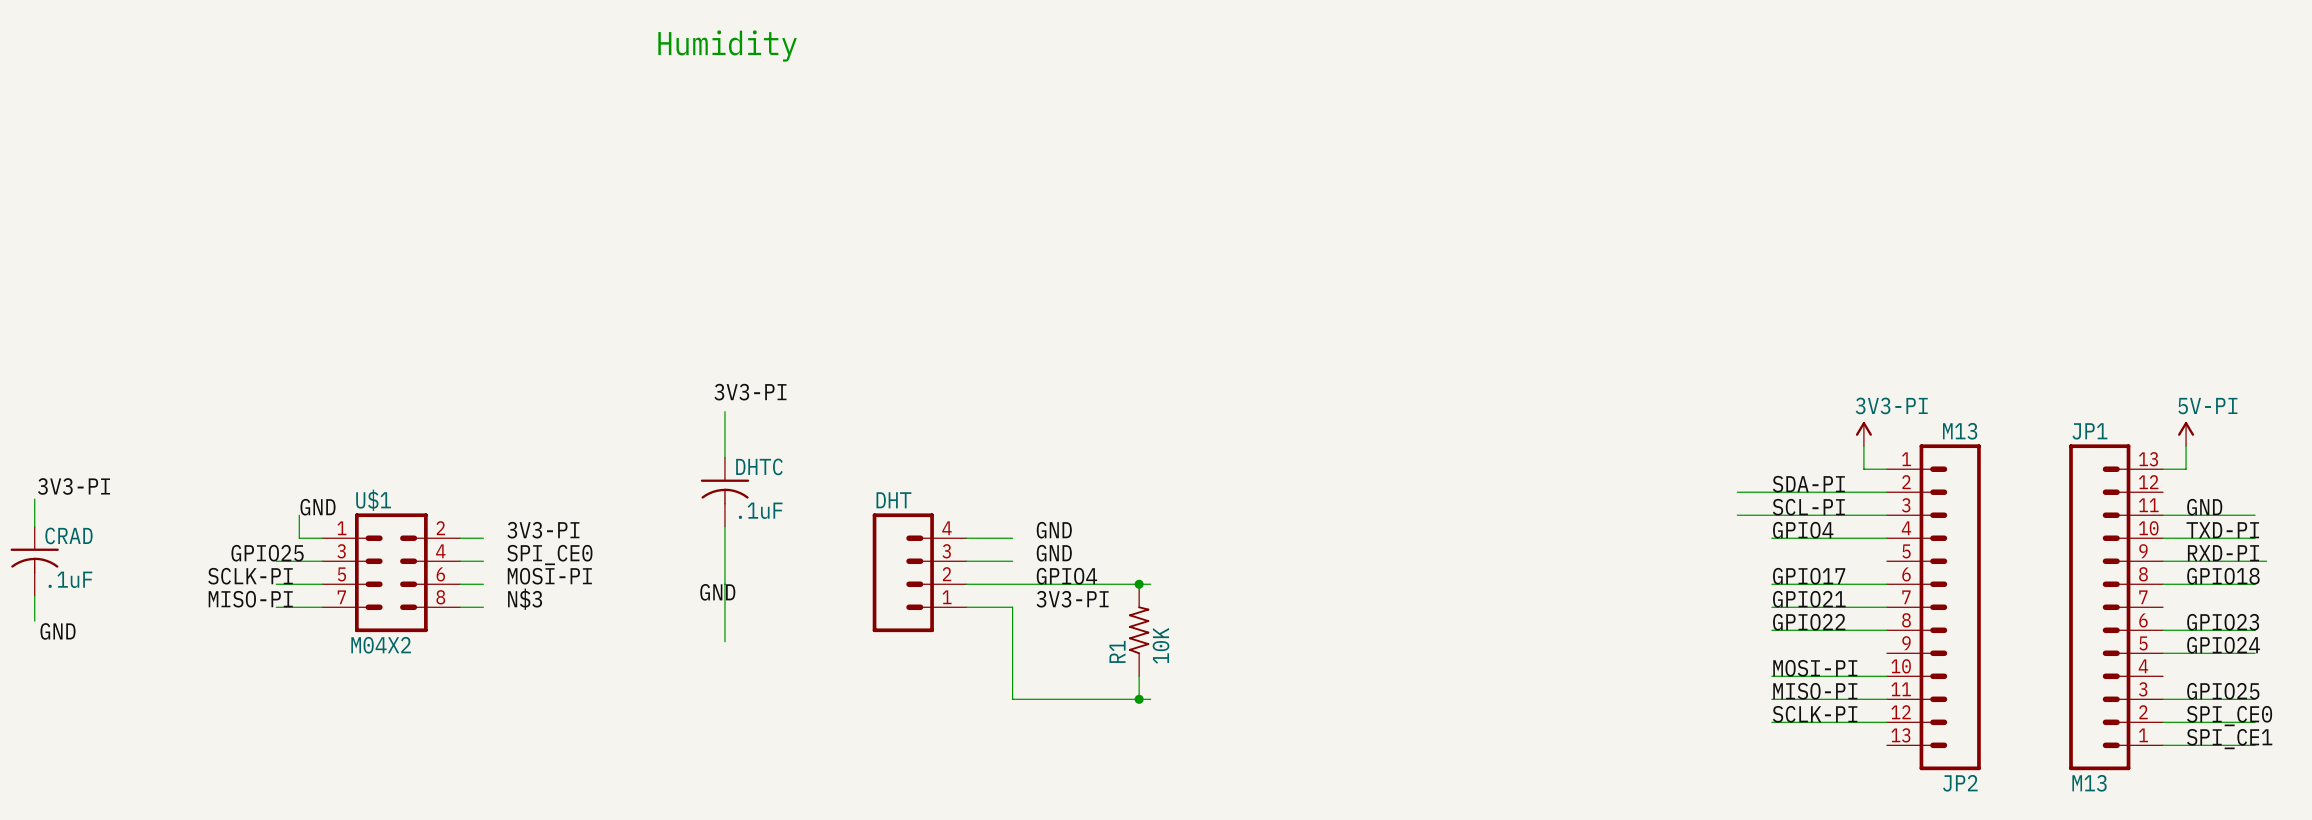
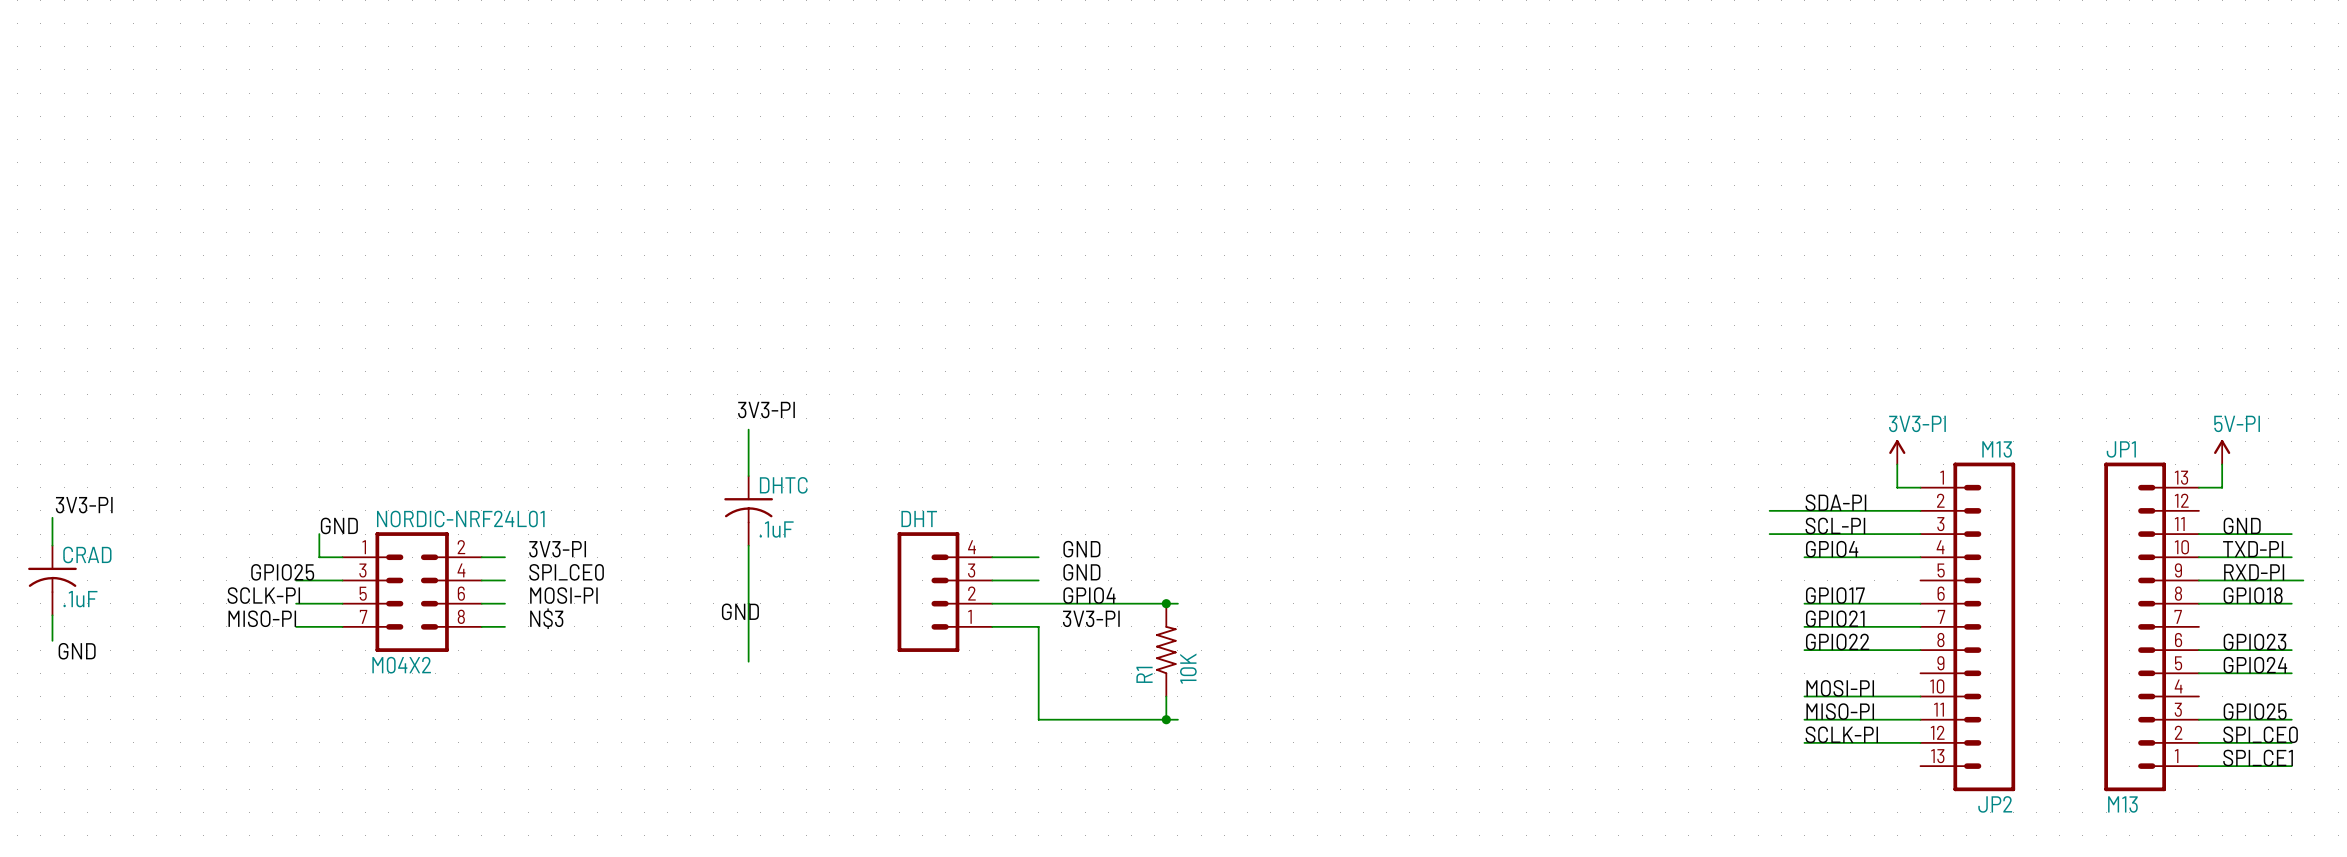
text: Humidity (727, 46) -> none
U$1 name: U$1 (373, 500) -> NORDIC-NRF24L01 (460, 518)

